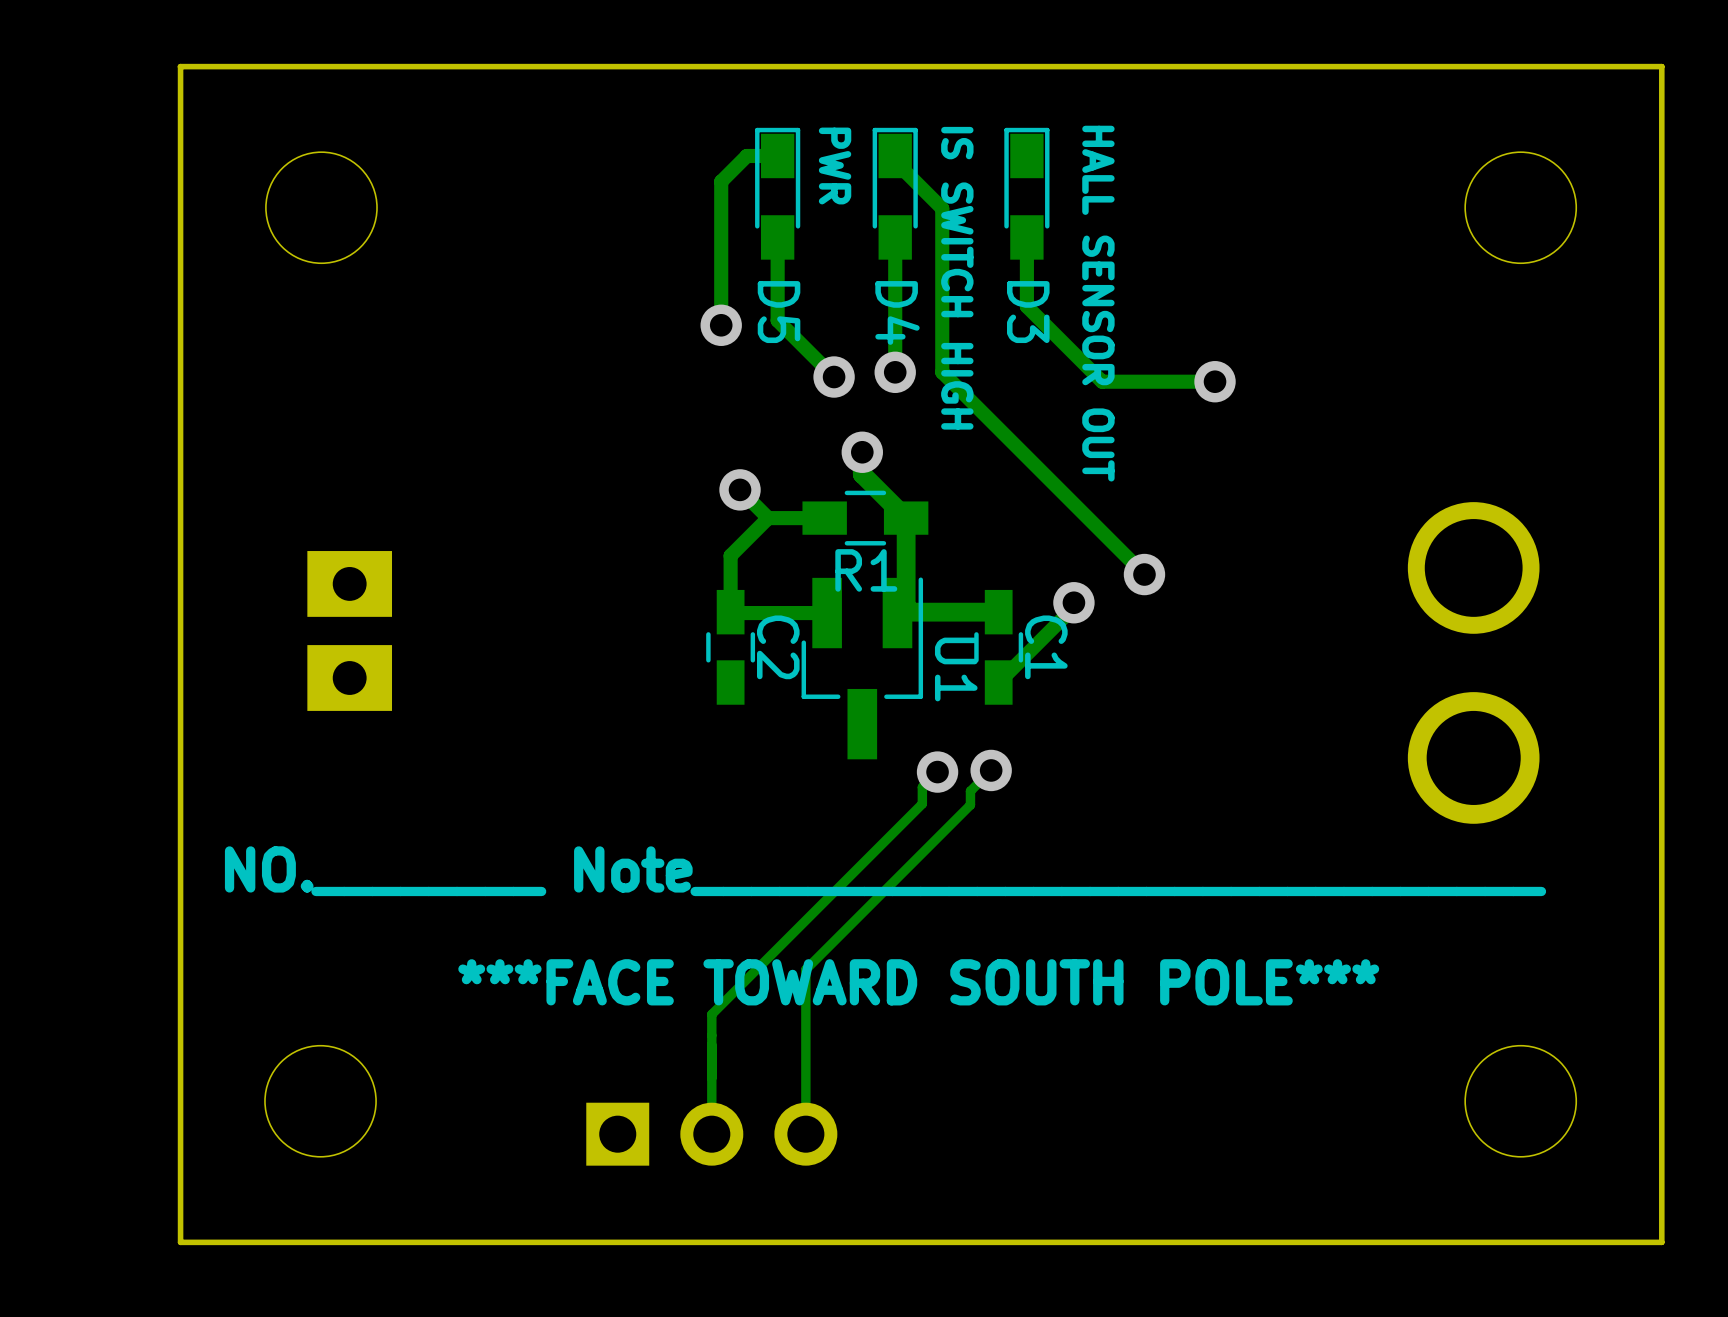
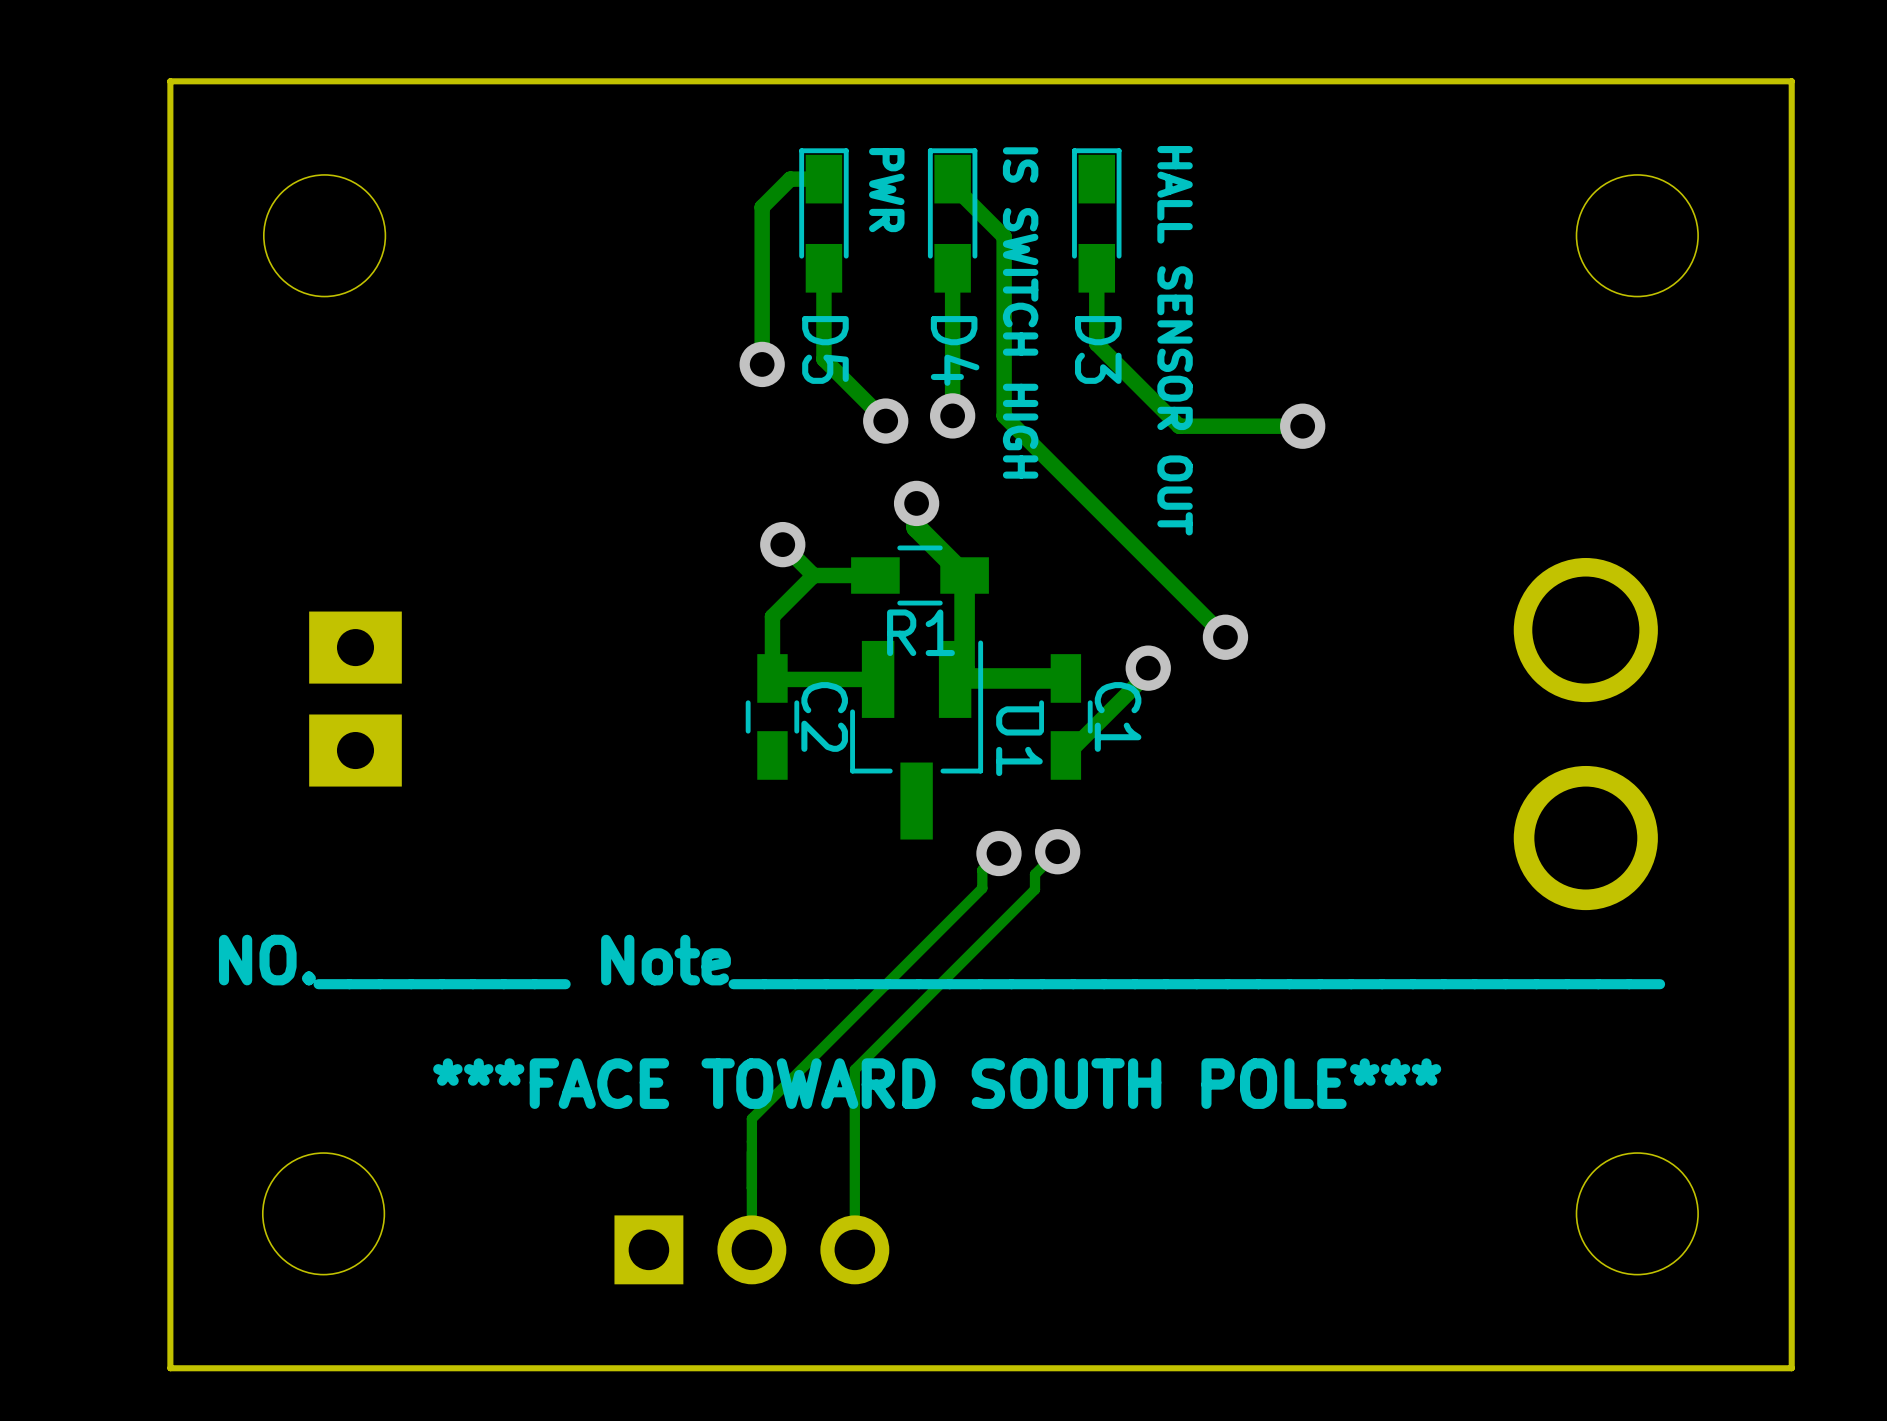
text position: ***FACE TOWARD SOUTH POLE*** (918, 982) -> ***FACE TOWARD SOUTH POLE*** (937, 1083)

